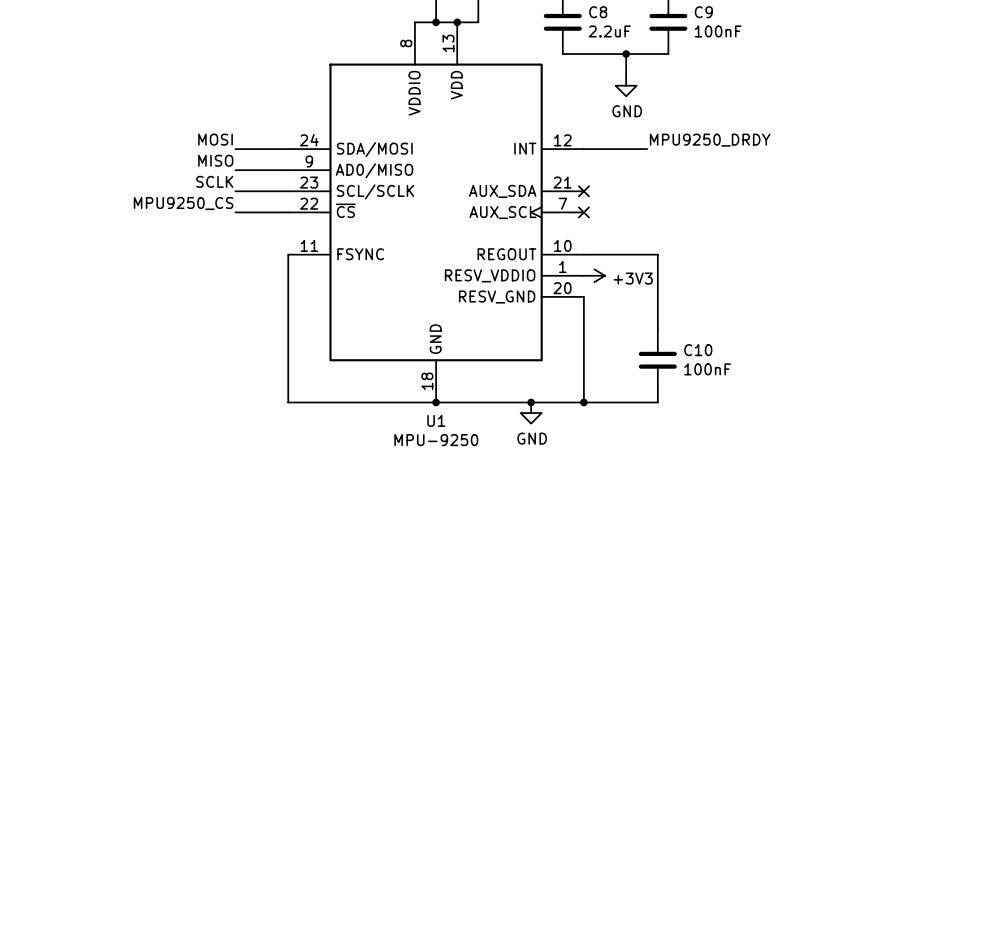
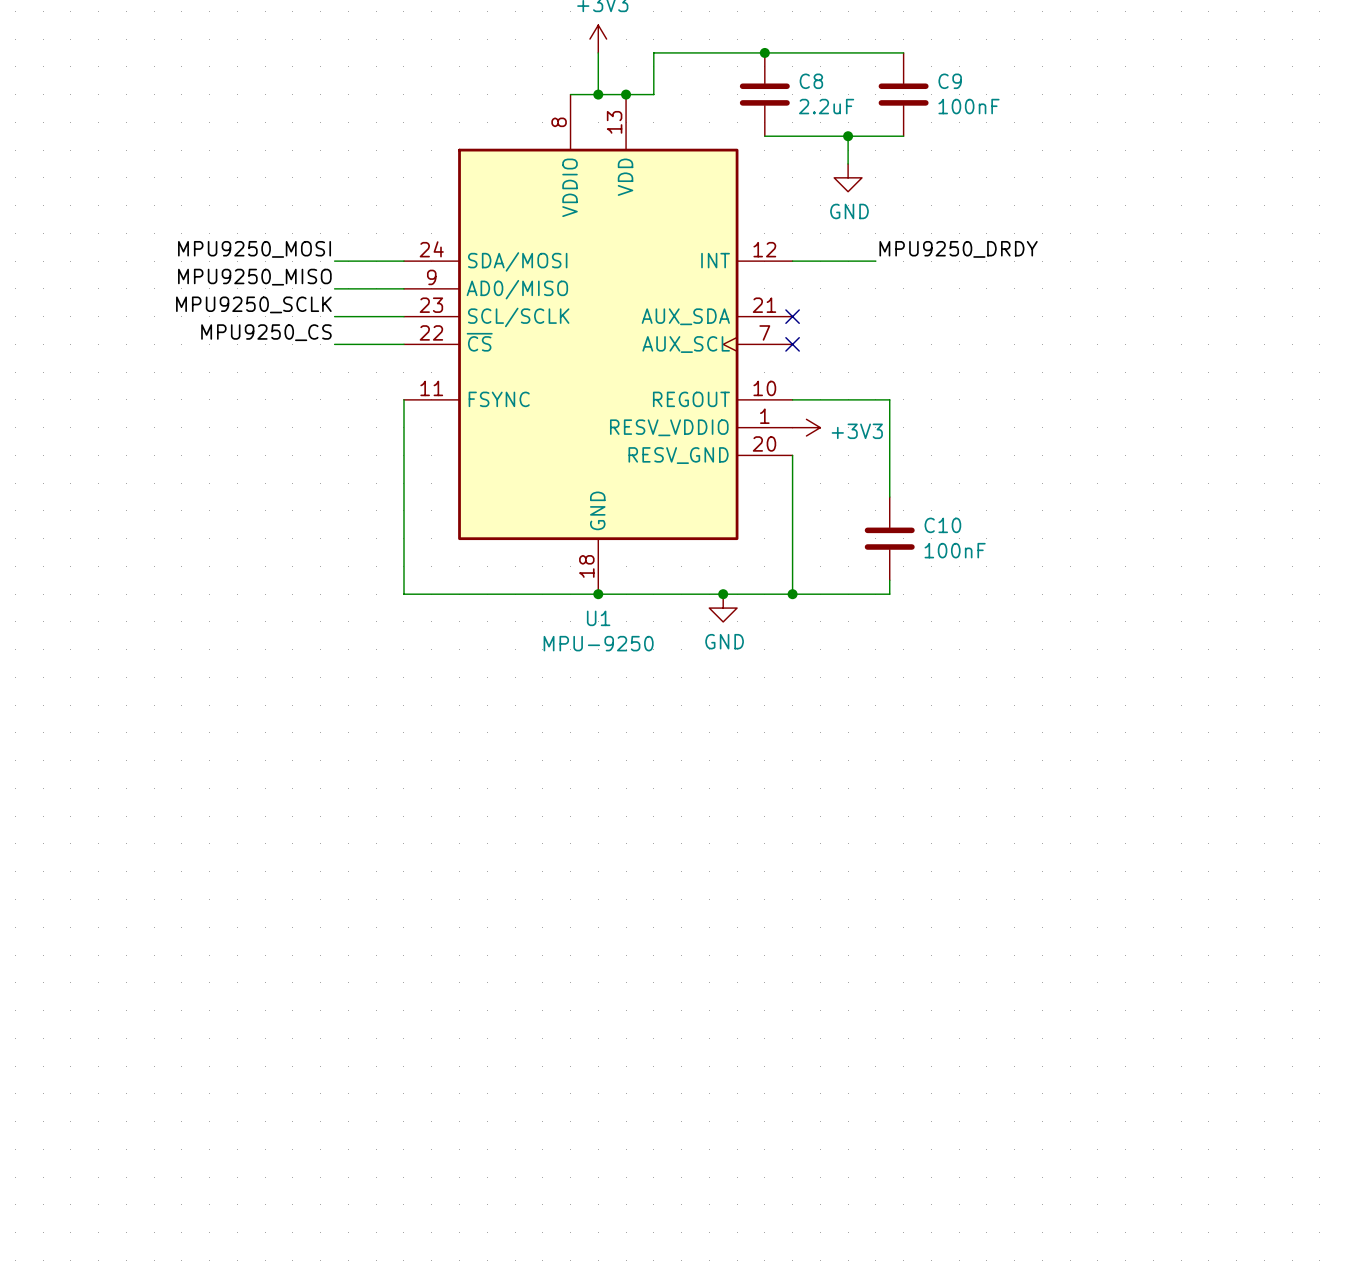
label: MOSI (215, 139) -> MPU9250_MOSI (254, 249)
label: MISO (215, 160) -> MPU9250_MISO (254, 277)
label: SCLK (214, 181) -> MPU9250_SCLK (253, 304)

